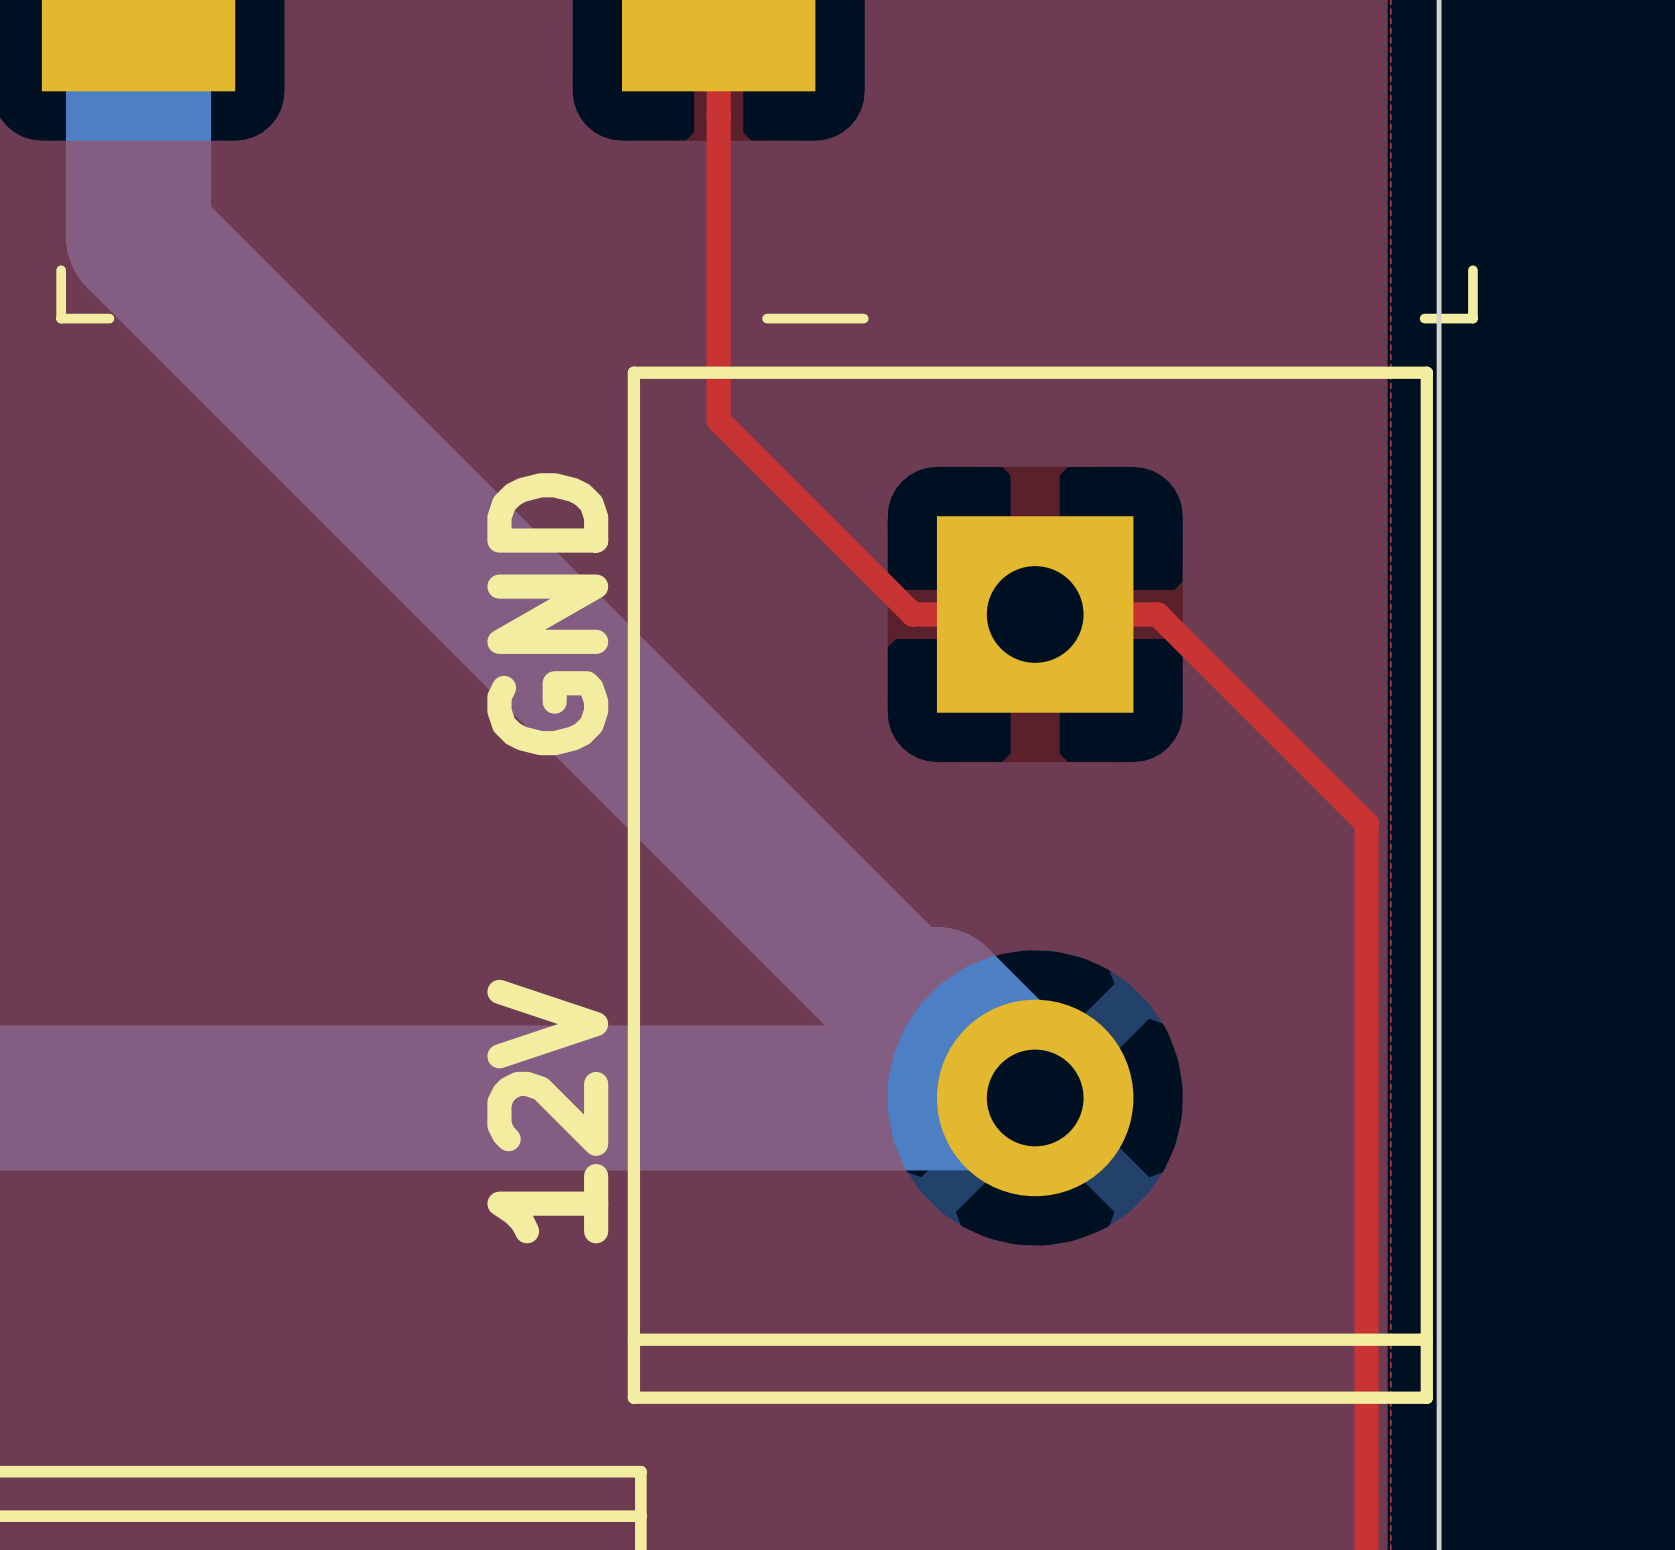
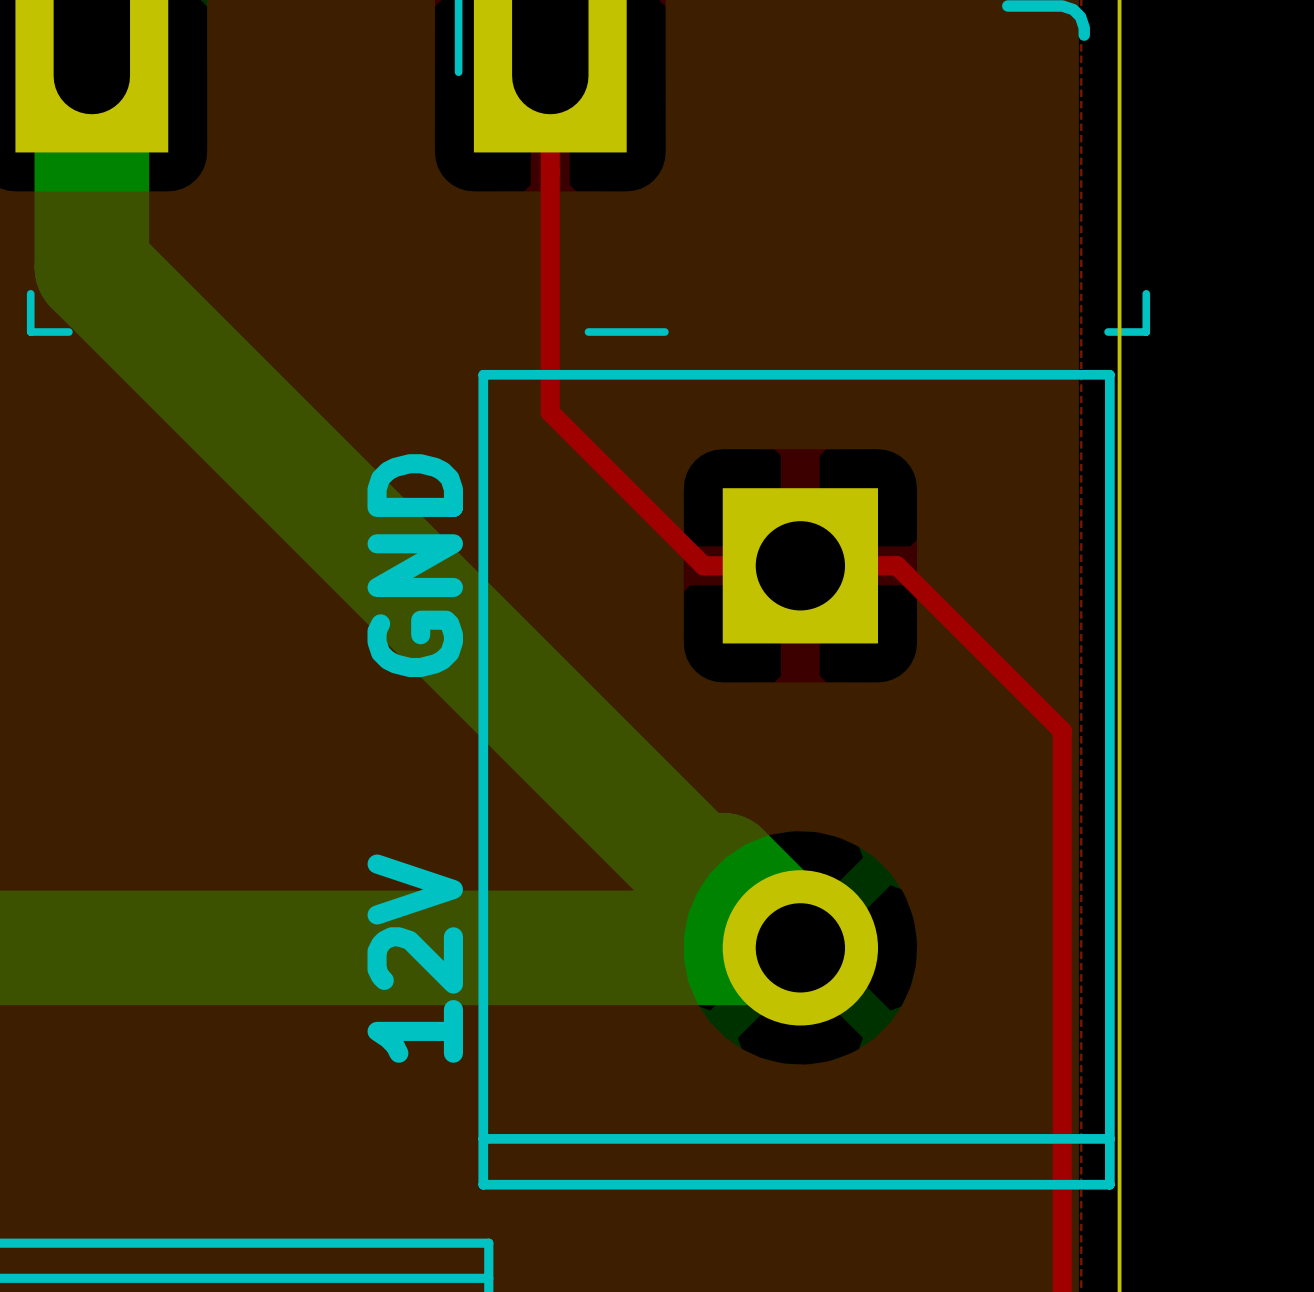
part footprint: [627, 366, 1433, 1404] -> [478, 369, 1115, 1190]

